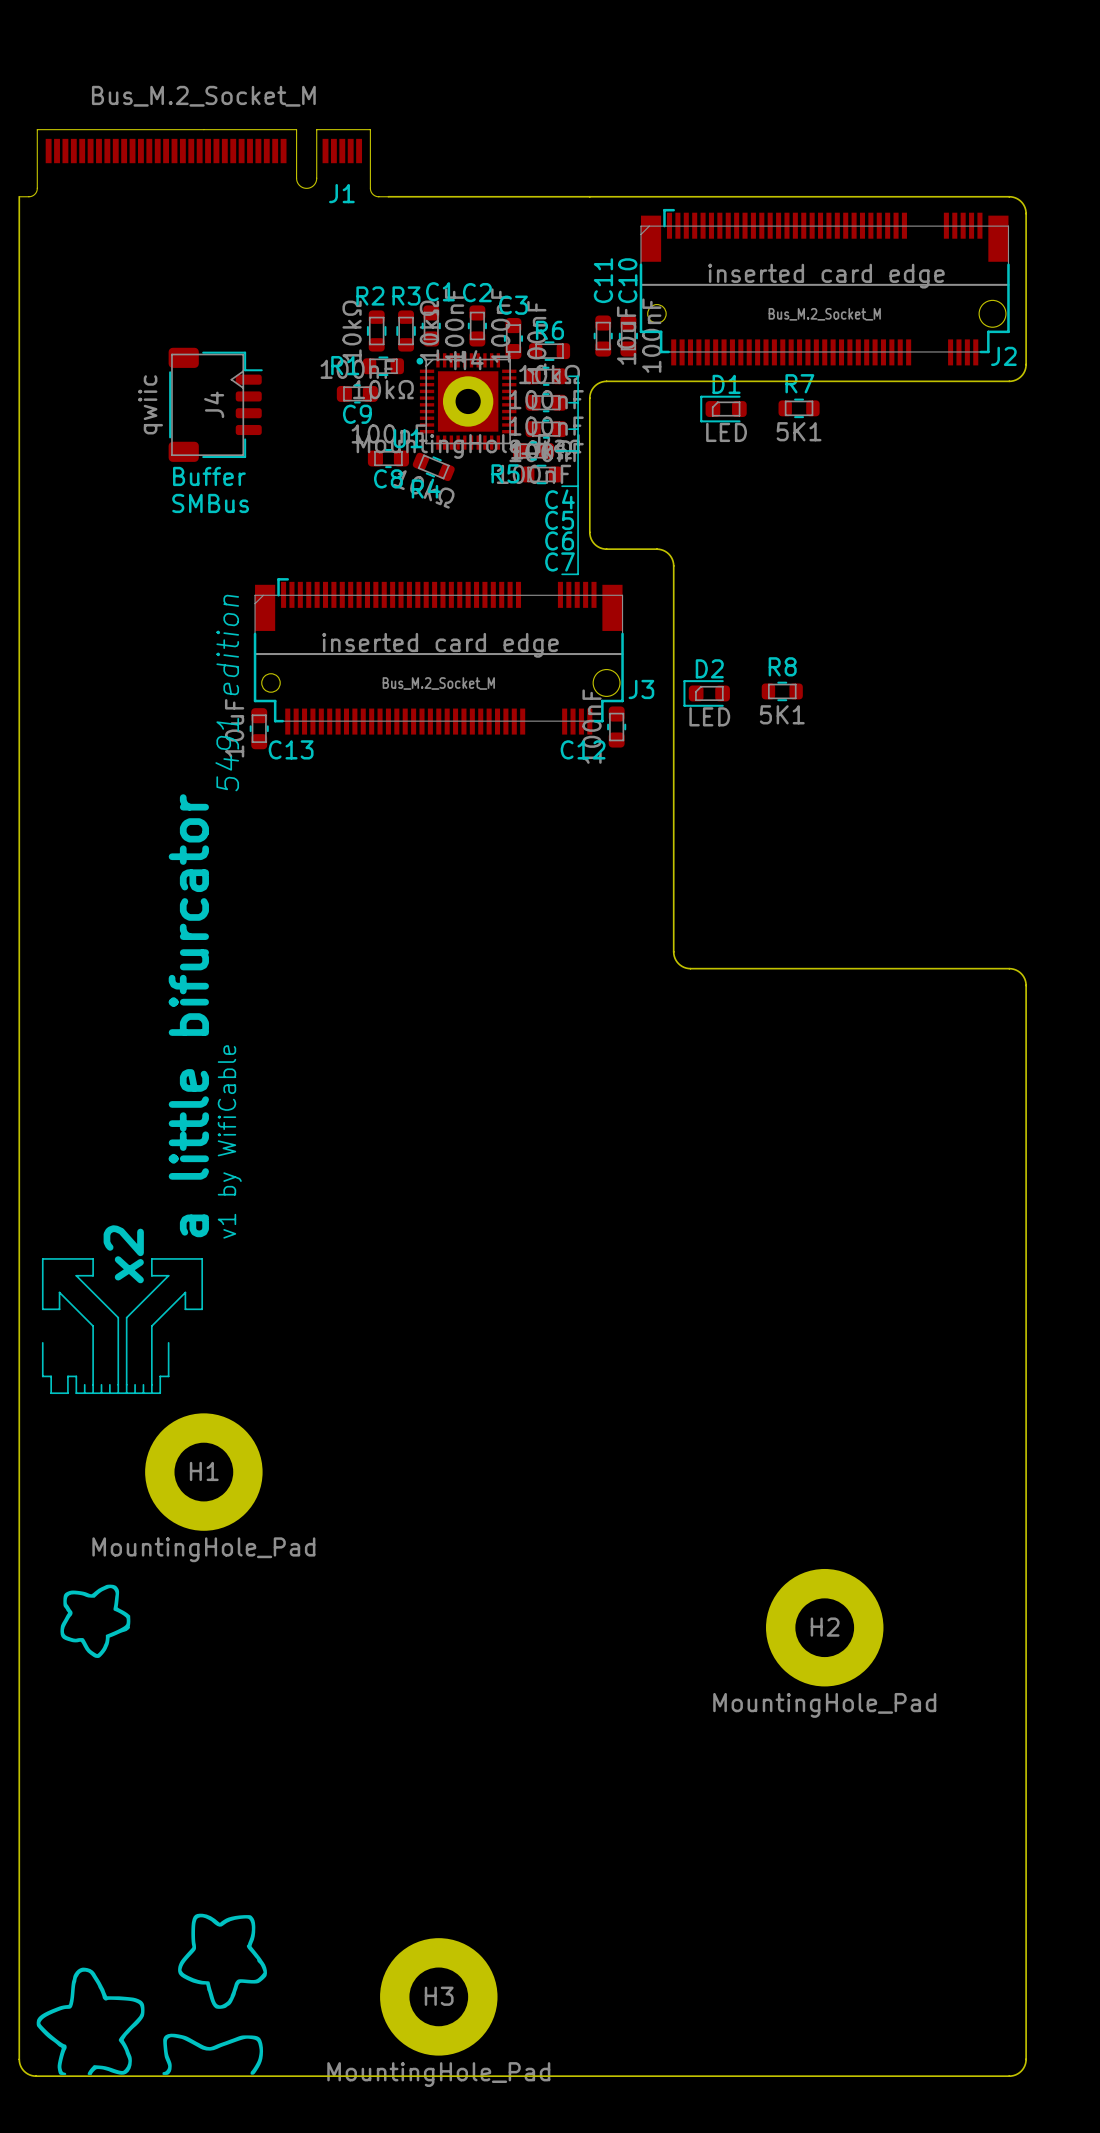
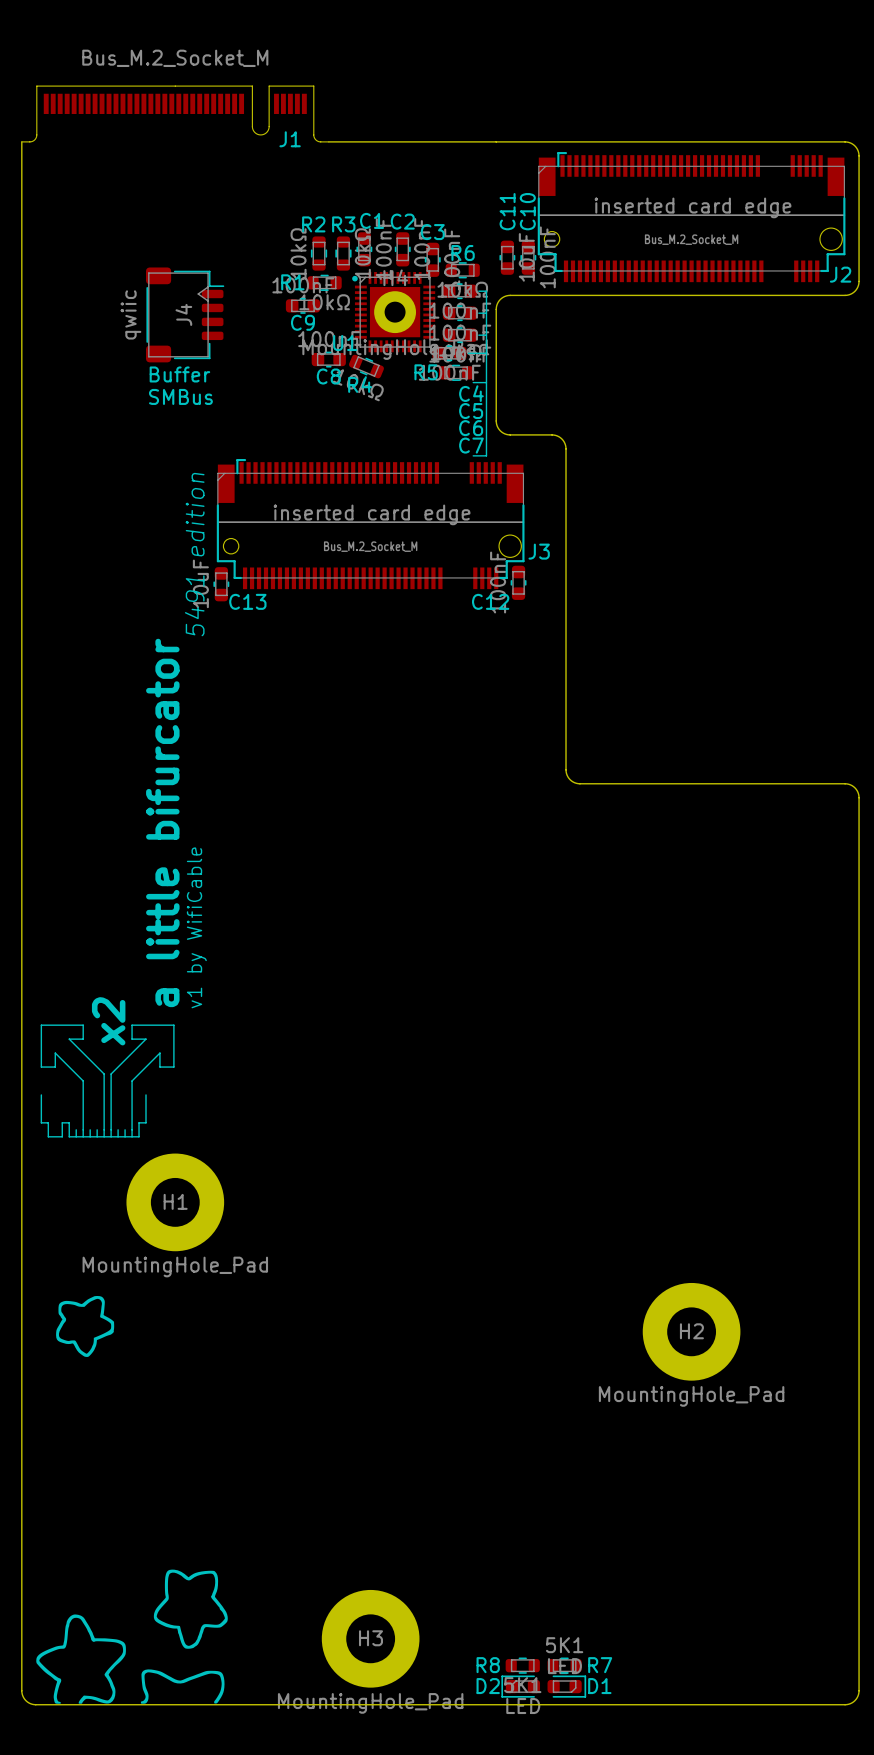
R7 name position: R7 (799, 383) -> R7 (600, 1665)
D1 name position: D1 (726, 384) -> D1 (599, 1686)
R7 position: (799, 408) -> (564, 1665)
D1 rotation: 0° (723, 409) -> 180° (566, 1686)
D1 position: (723, 409) -> (566, 1686)
R7 value position: 5K1 (799, 431) -> 5K1 (564, 1645)
R8 name position: R8 (782, 666) -> R8 (488, 1665)
D2 name position: D2 (709, 668) -> D2 (488, 1686)
R8 position: (782, 691) -> (522, 1665)
D2 position: (706, 693) -> (520, 1686)

